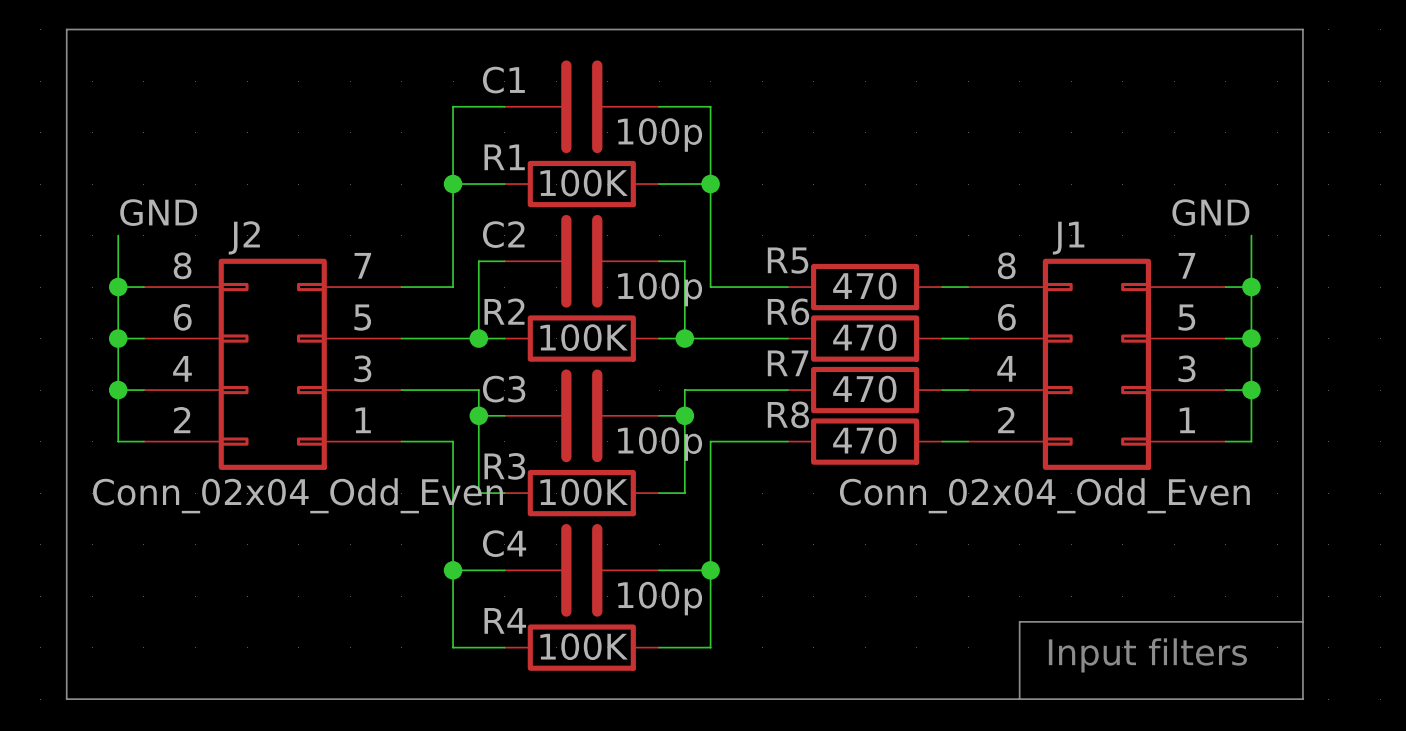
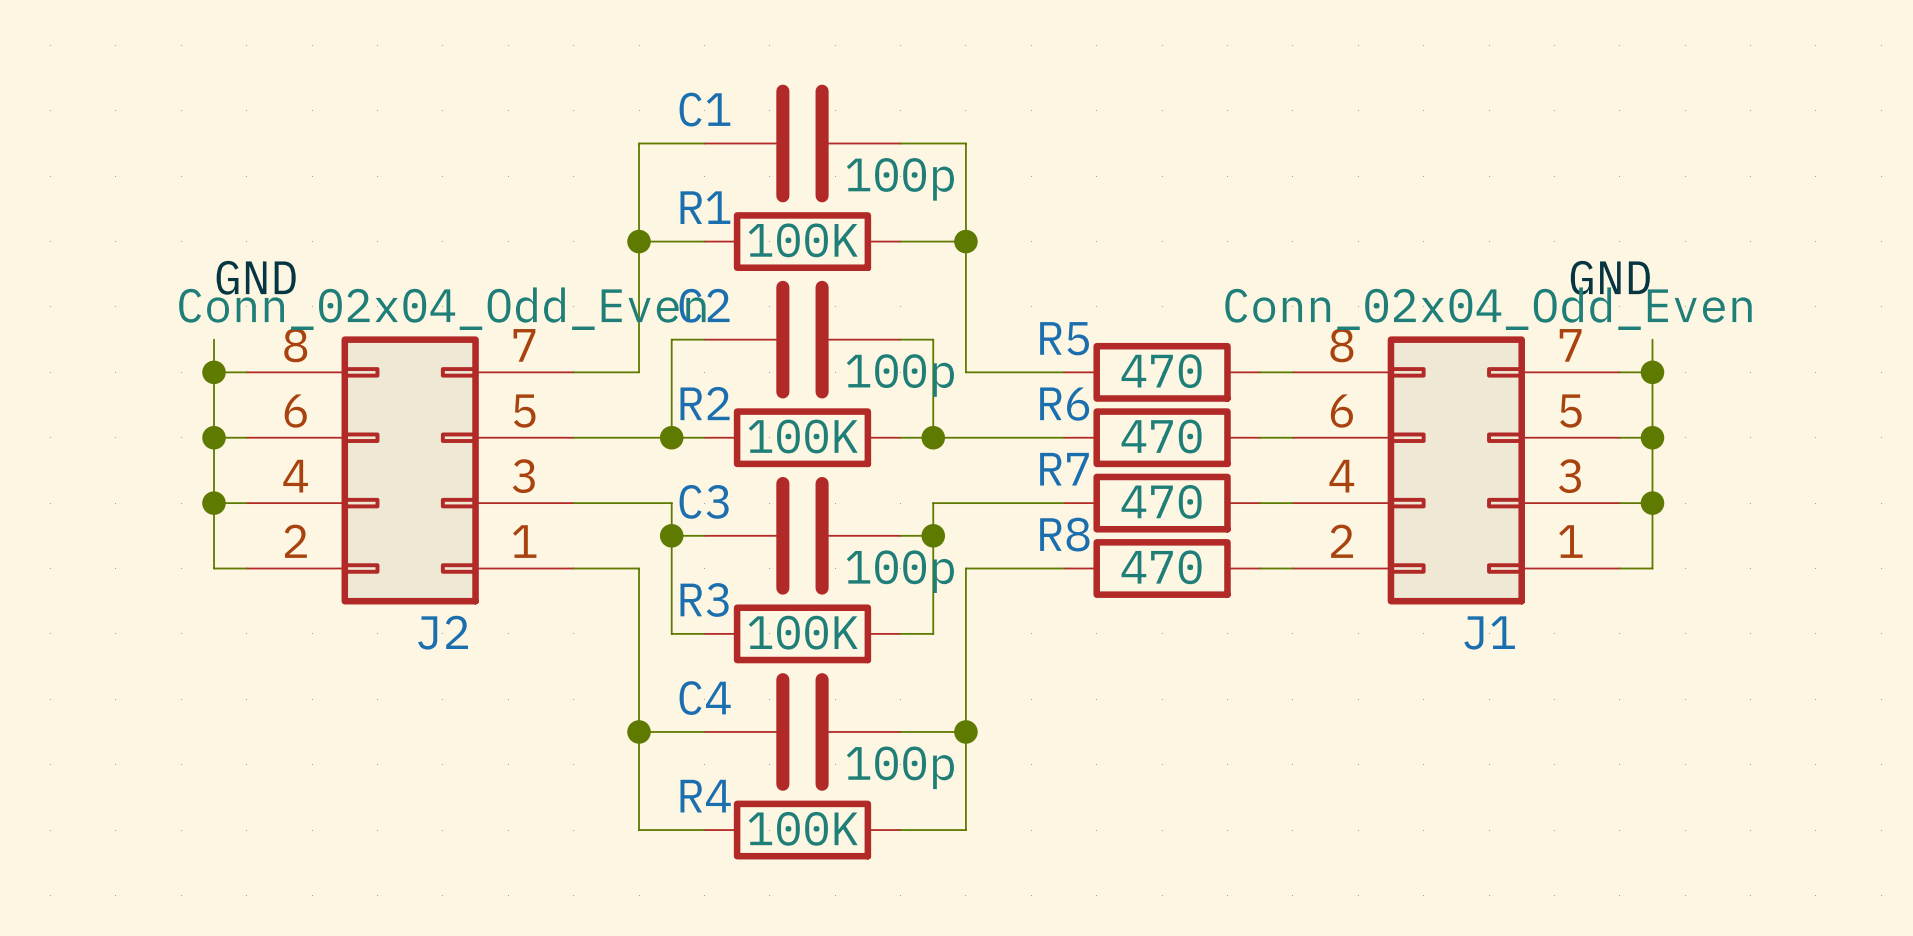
line: (66, 29) (66, 699) (1302, 699) (1302, 29) (66, 29) -> none
wire: (118, 235) (118, 261) -> none
wire: (1251, 235) (1251, 261) -> none
J2 name position: J2 (244, 237) -> J2 (443, 632)
J1 name position: J1 (1068, 238) -> J1 (1489, 632)
J2 value position: Conn_02x04_Odd_Even (298, 495) -> Conn_02x04_Odd_Even (442, 308)
J1 value position: Conn_02x04_Odd_Even (1044, 495) -> Conn_02x04_Odd_Even (1488, 308)
line: (1302, 621) (1019, 621) (1019, 699) -> none
text: Input filters (1147, 655) -> none

